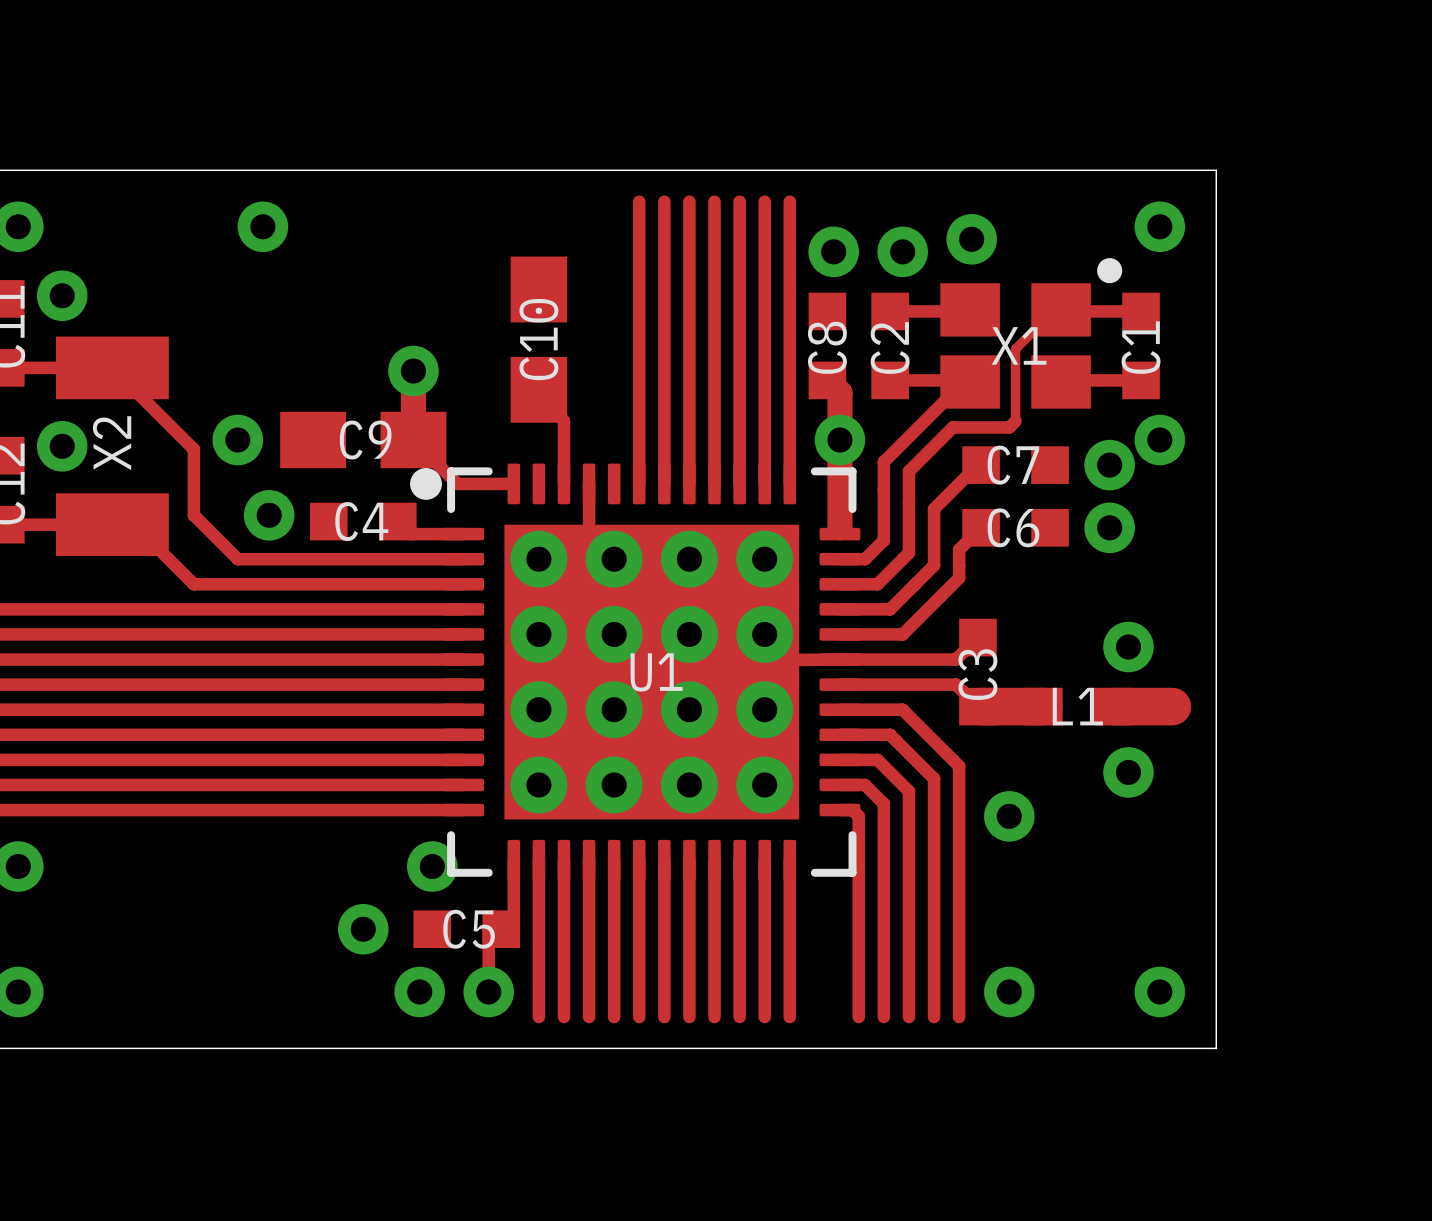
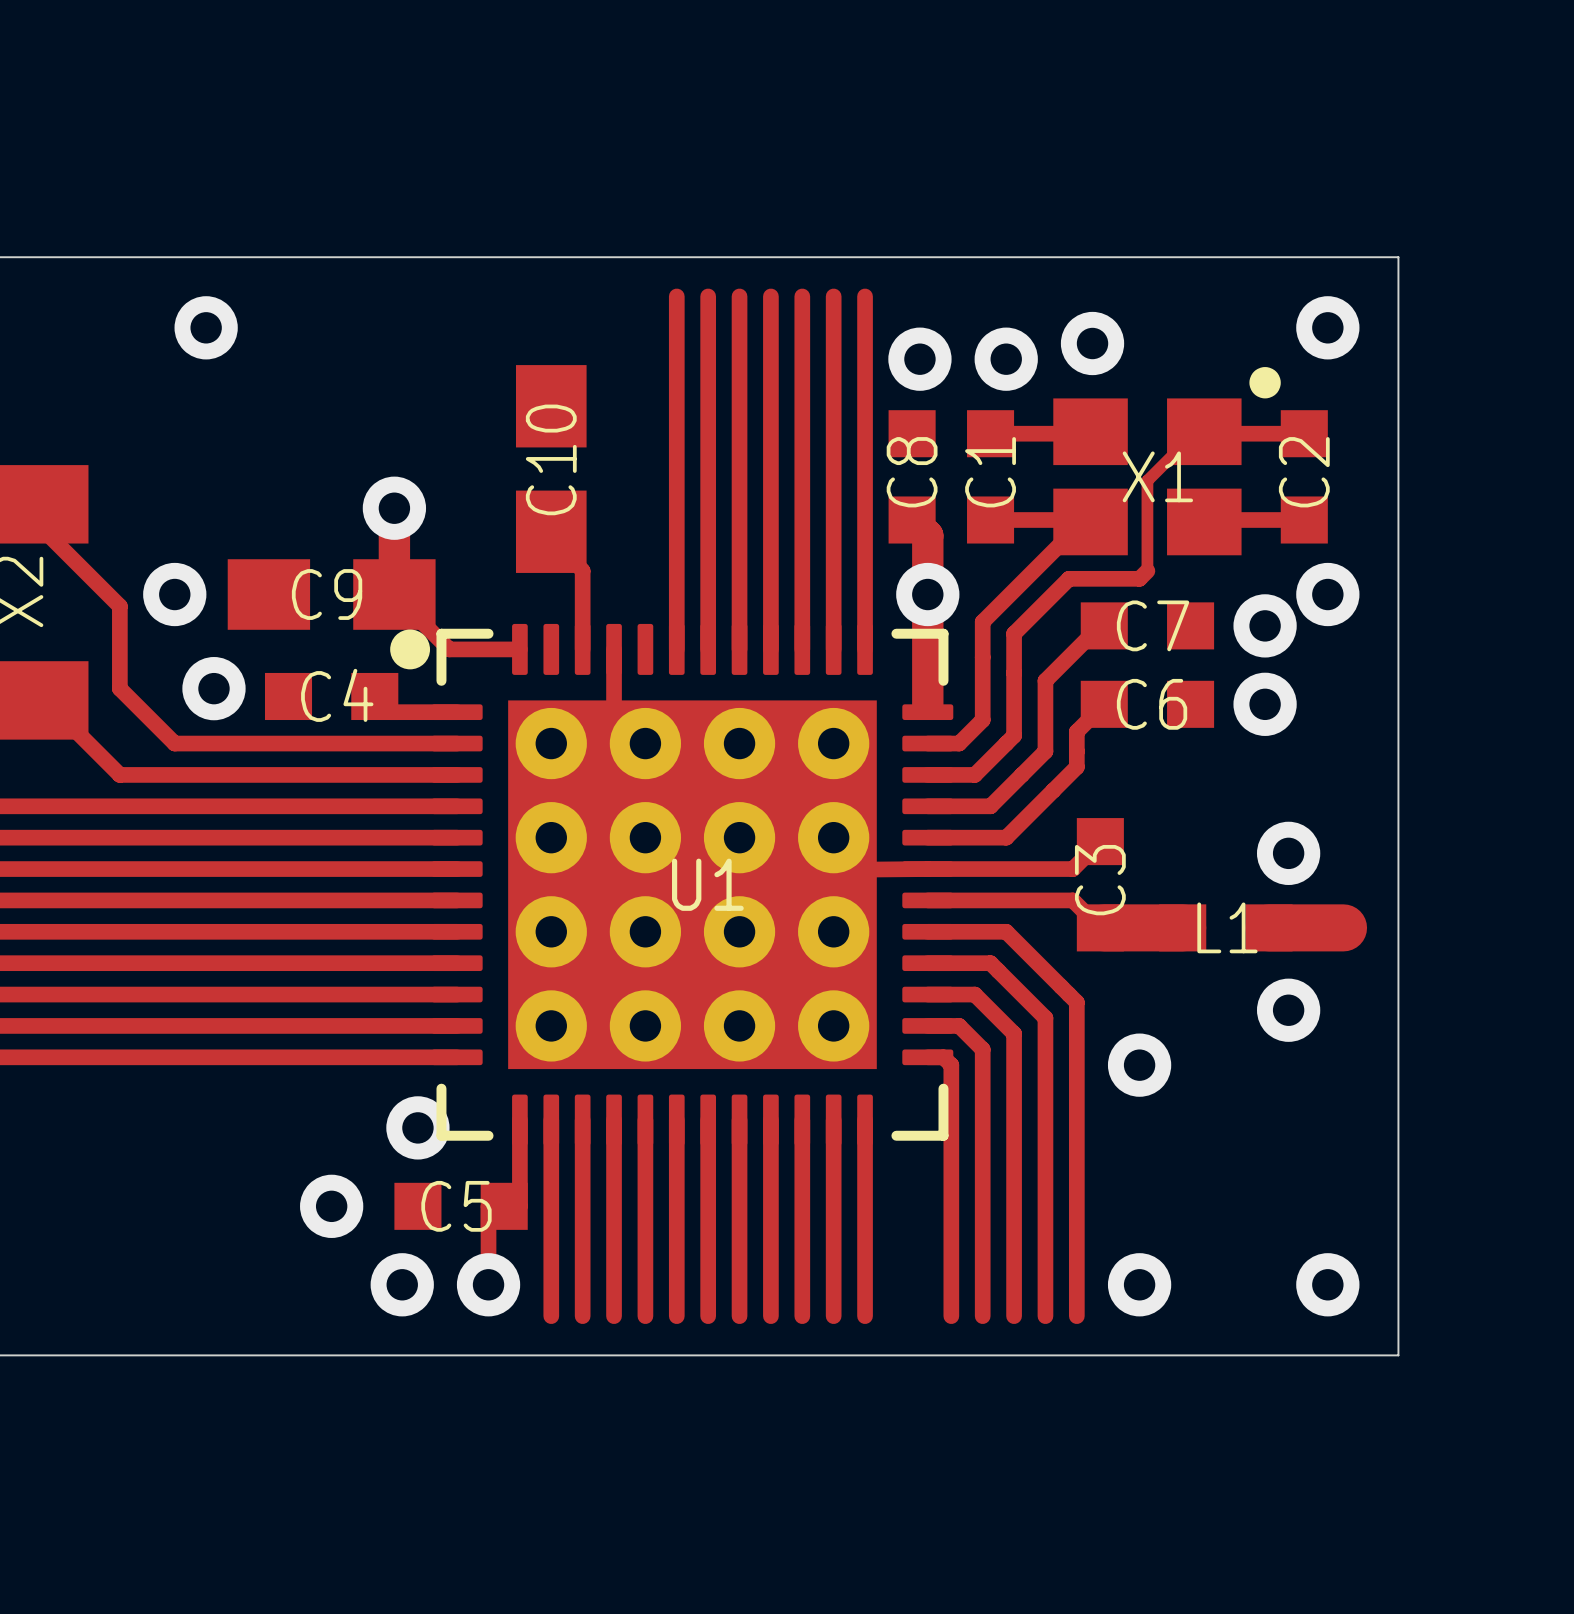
C1 name: C1 (1141, 347) -> C2 (1304, 472)
C2 name: C2 (890, 348) -> C1 (990, 472)

